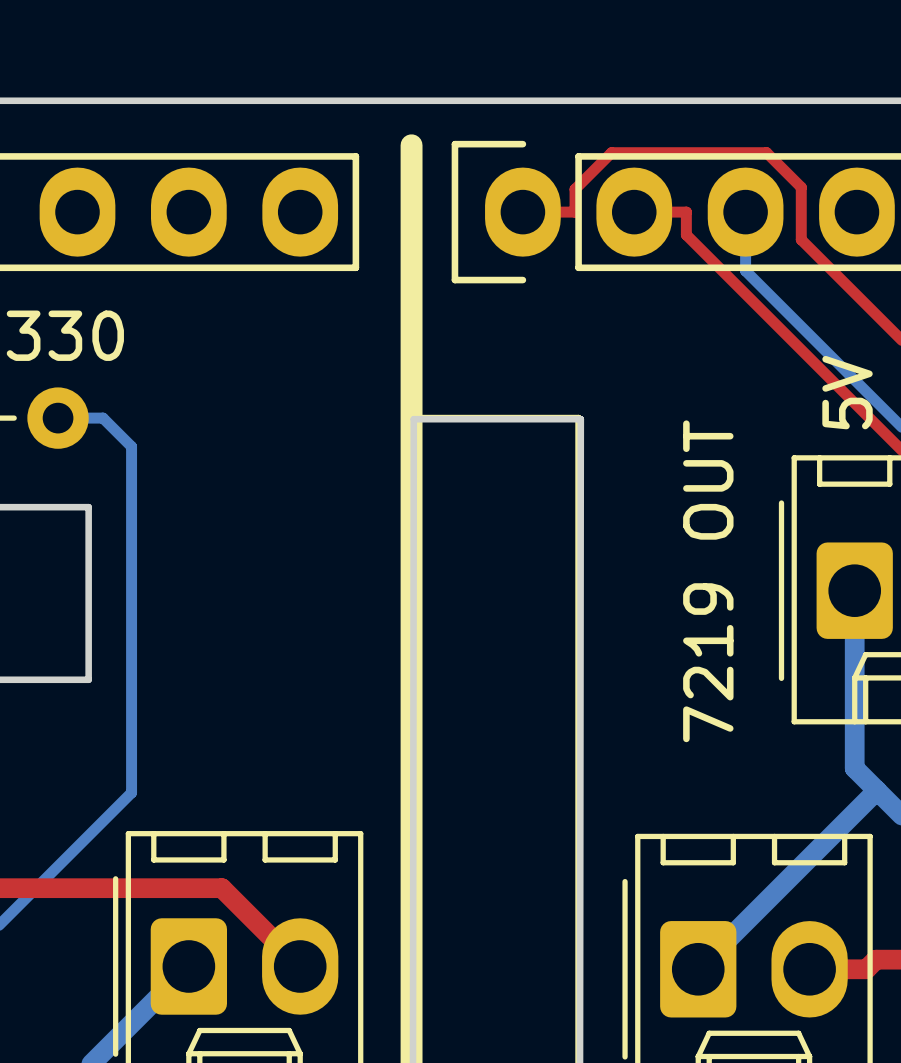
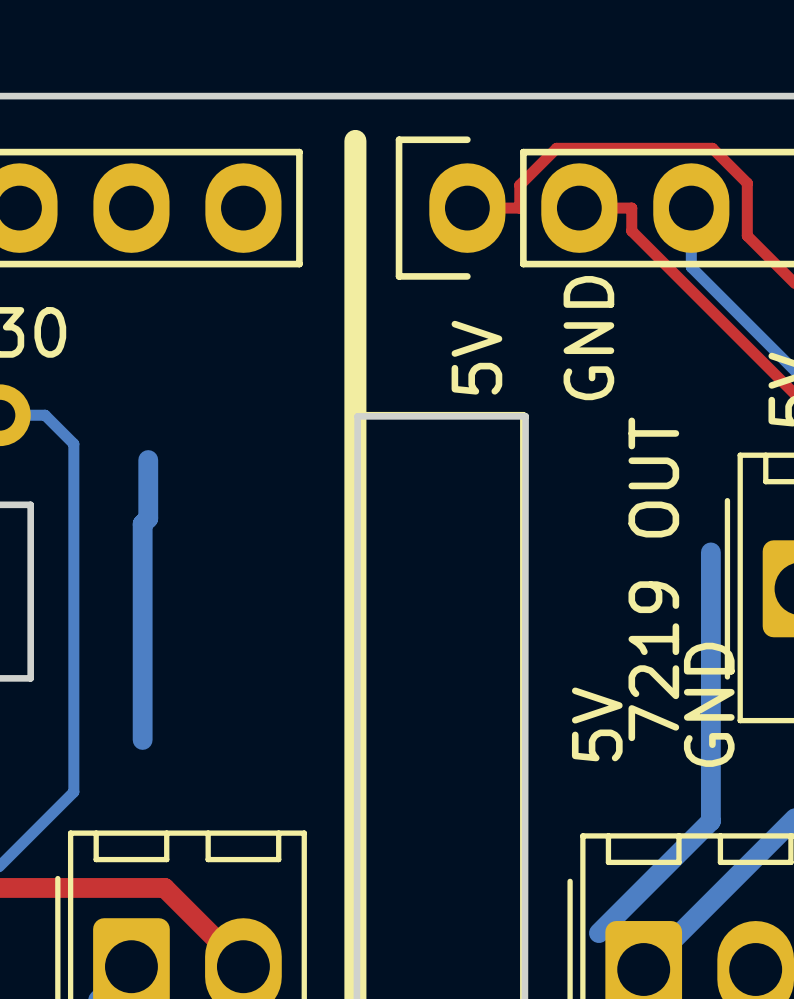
text: none -> GND (588, 338)
text: none -> 5V (476, 357)
bottom track: none -> (148, 460) (148, 518) (142, 524) (142, 739)
bottom track: none -> (710, 552) (710, 821) (598, 933)
text: none -> GND (709, 704)
text: none -> 5V (597, 724)

